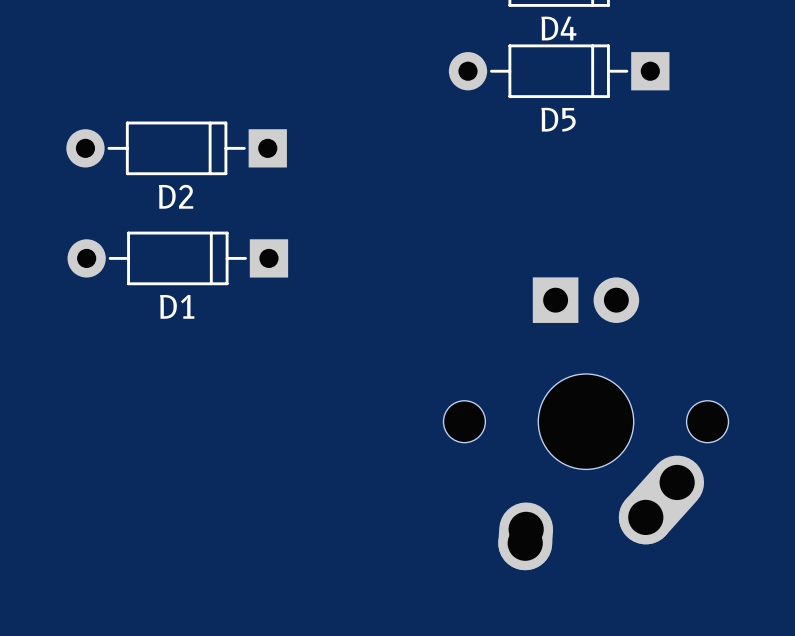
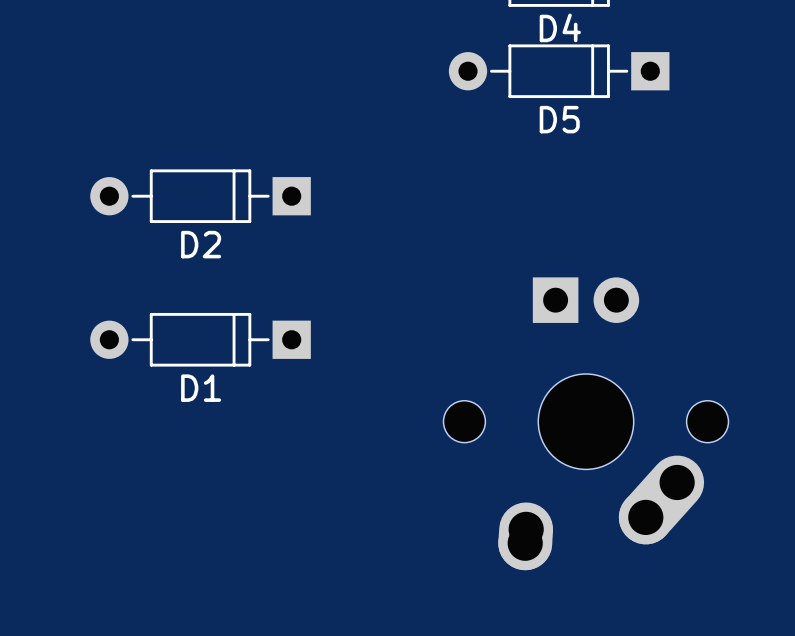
D2 position: (176, 148) -> (200, 196)
D1 position: (177, 258) -> (200, 339)

